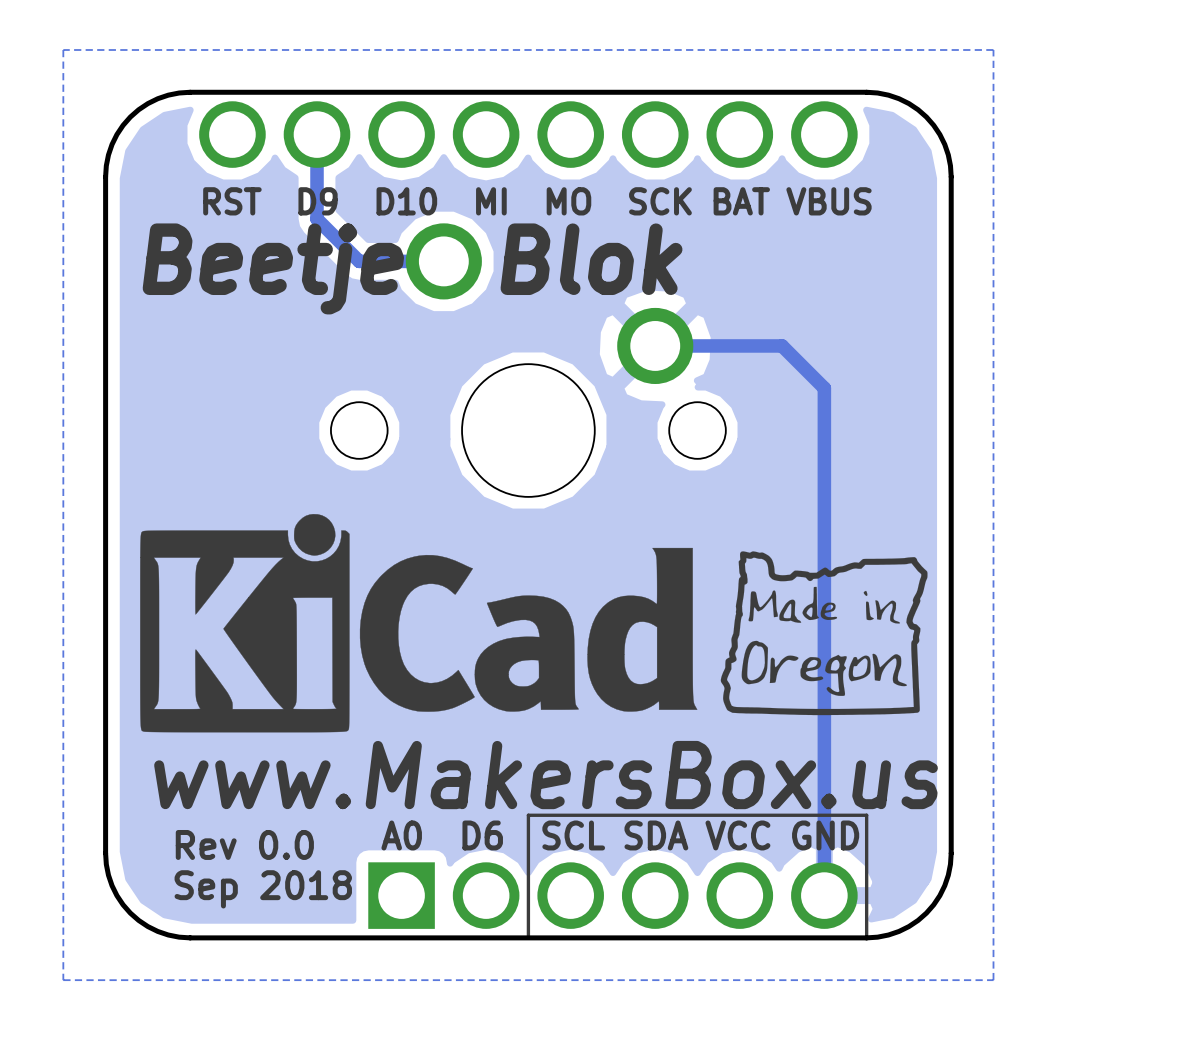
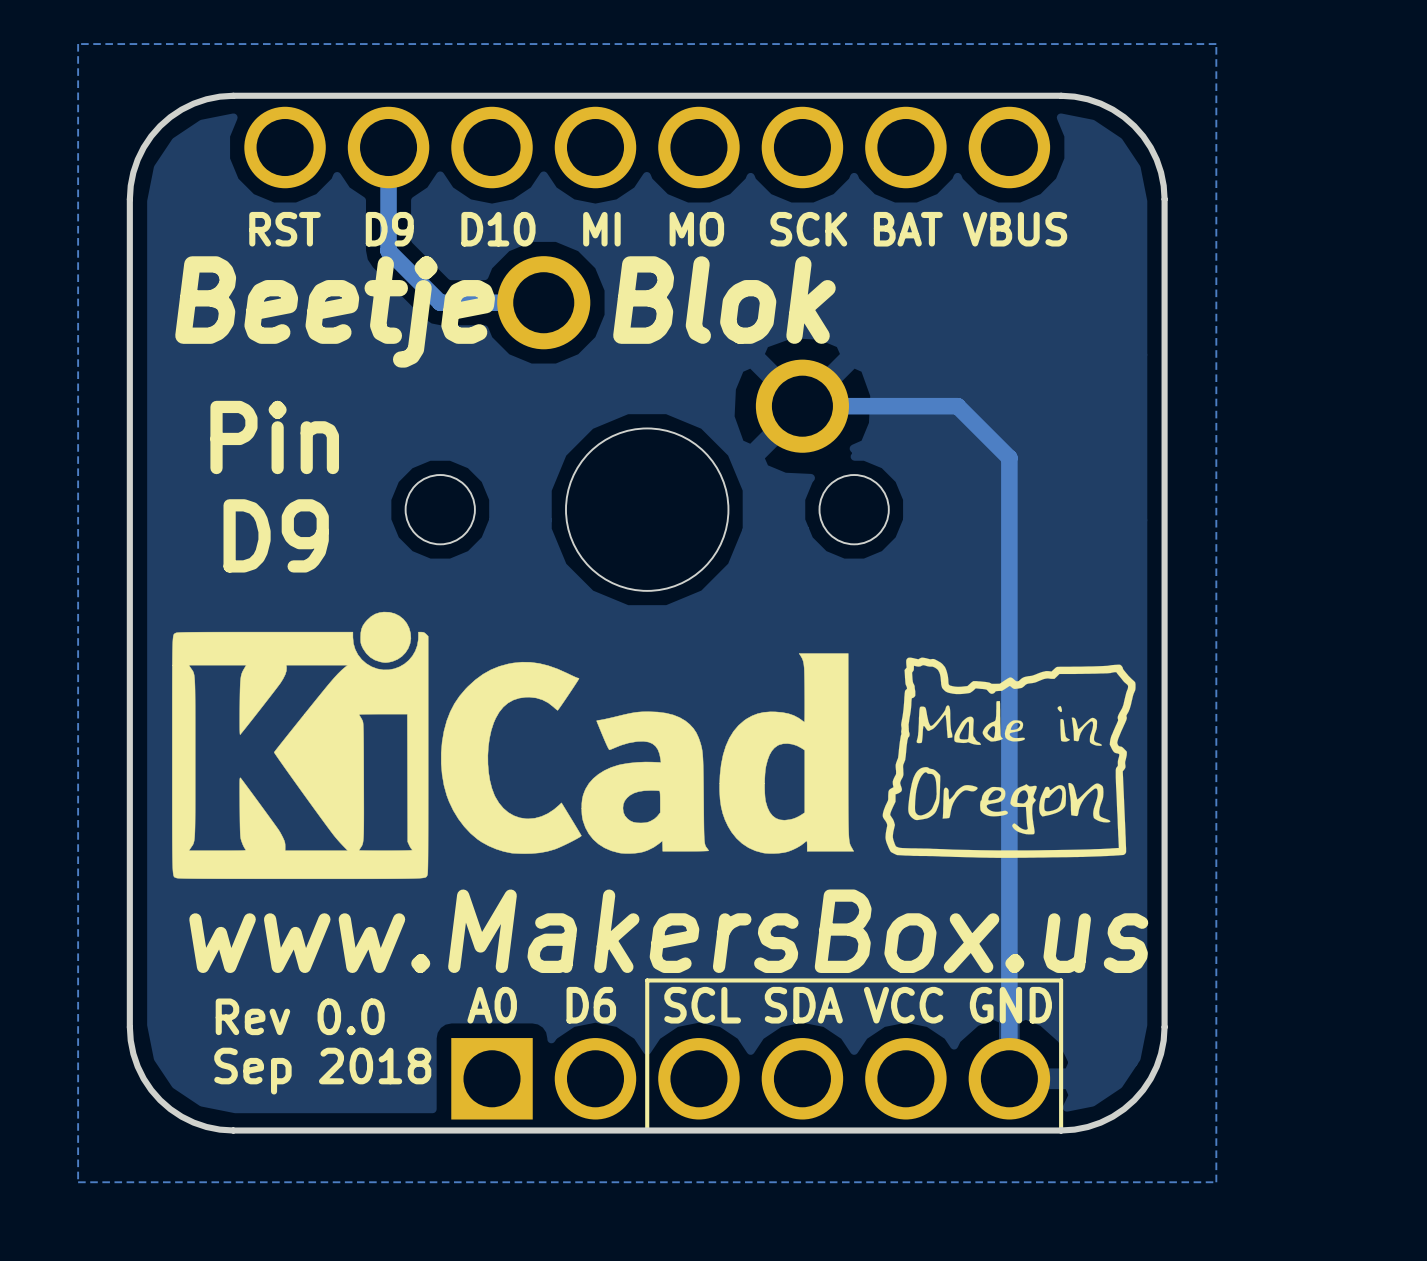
text: none -> Pin (274, 437)
text: none -> D9 (276, 535)

